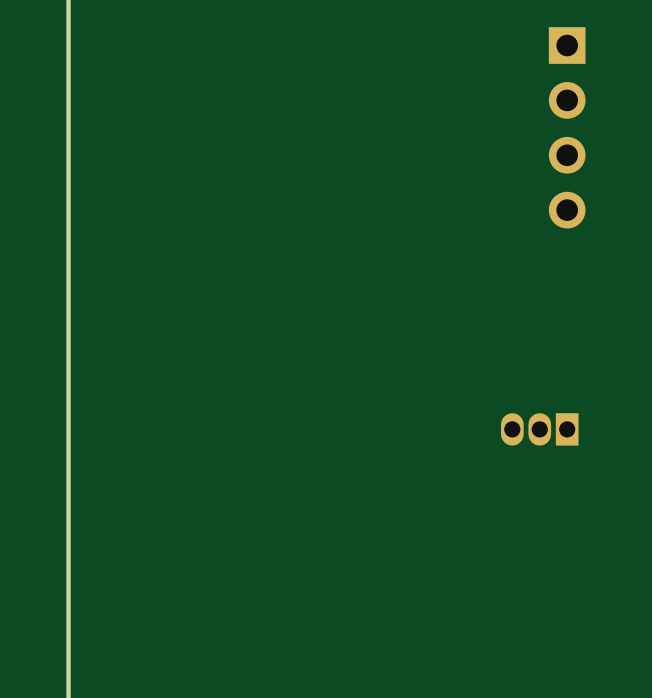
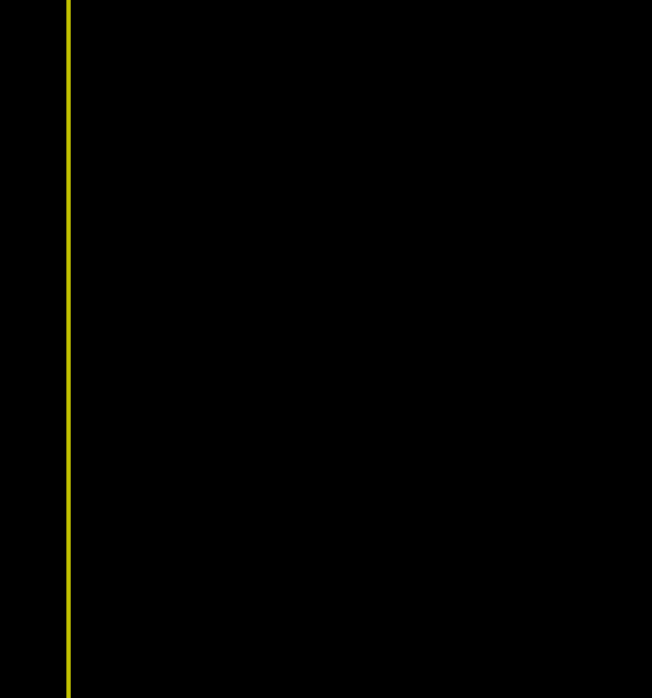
part: (567, 127) -> none
part: (539, 429) -> none

